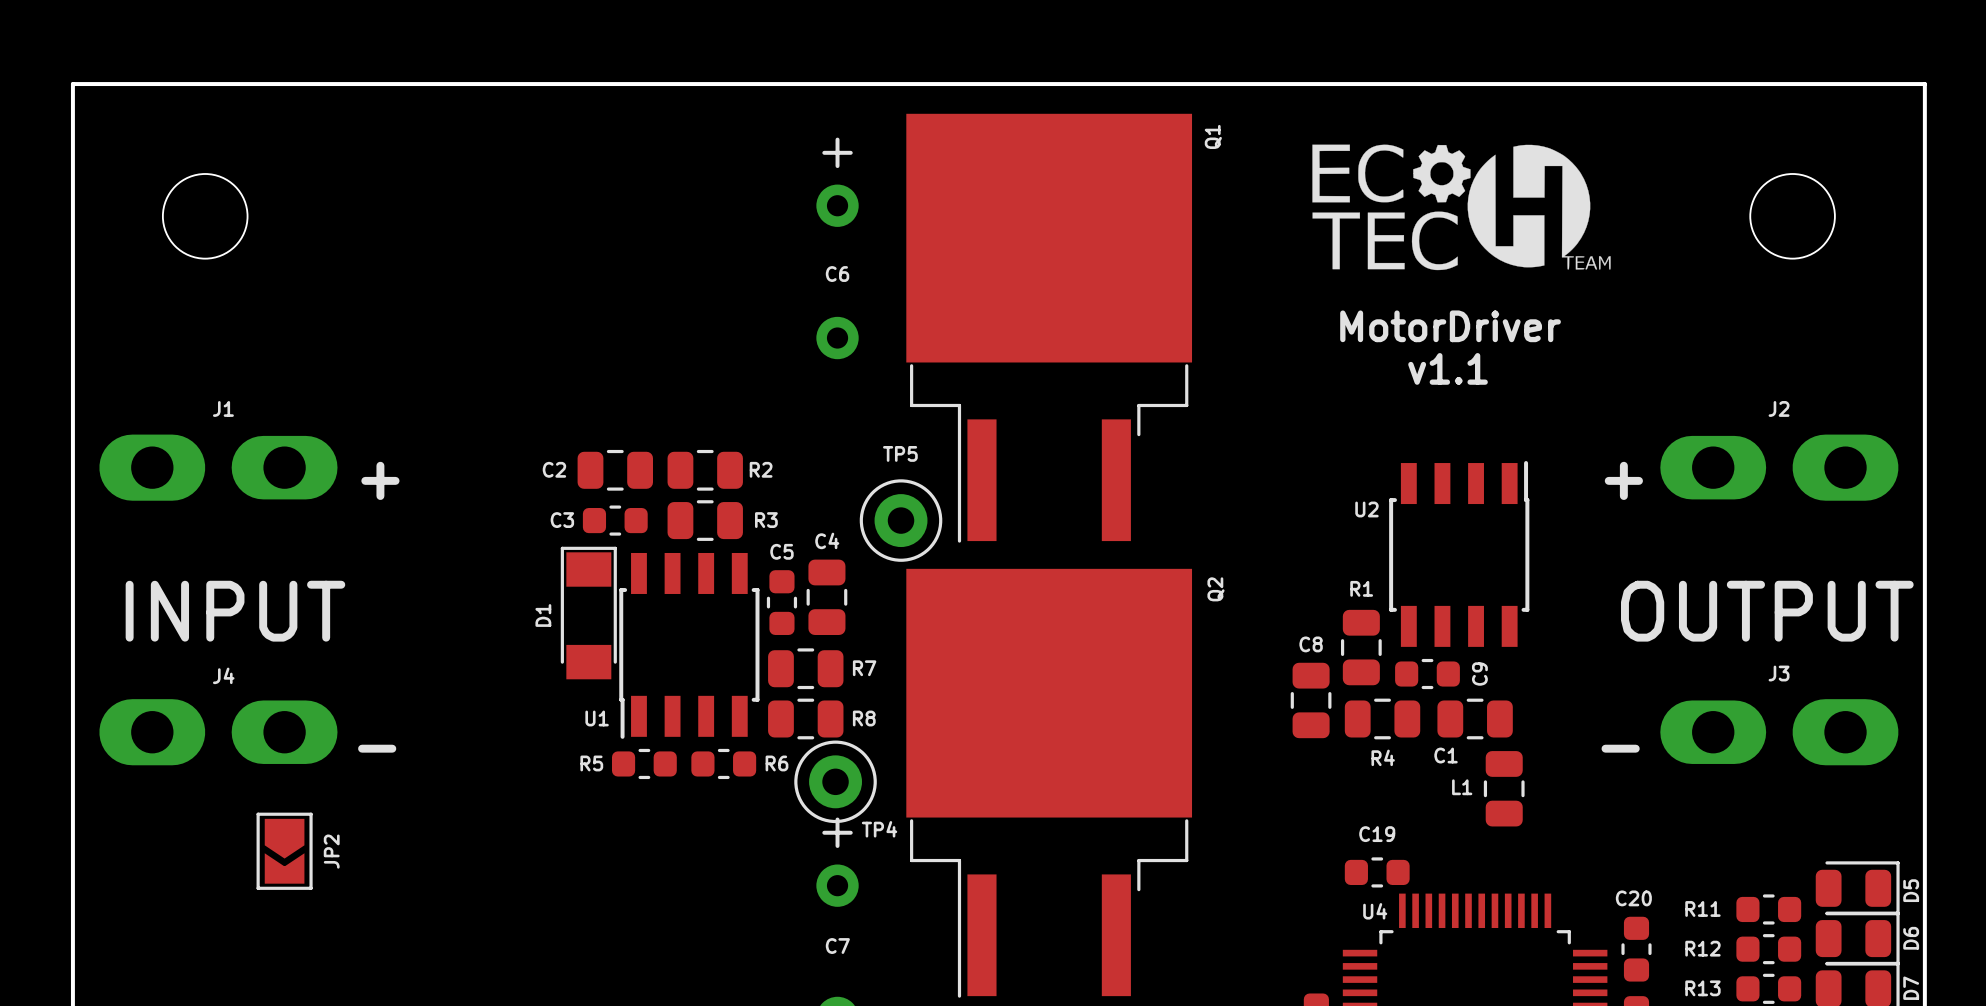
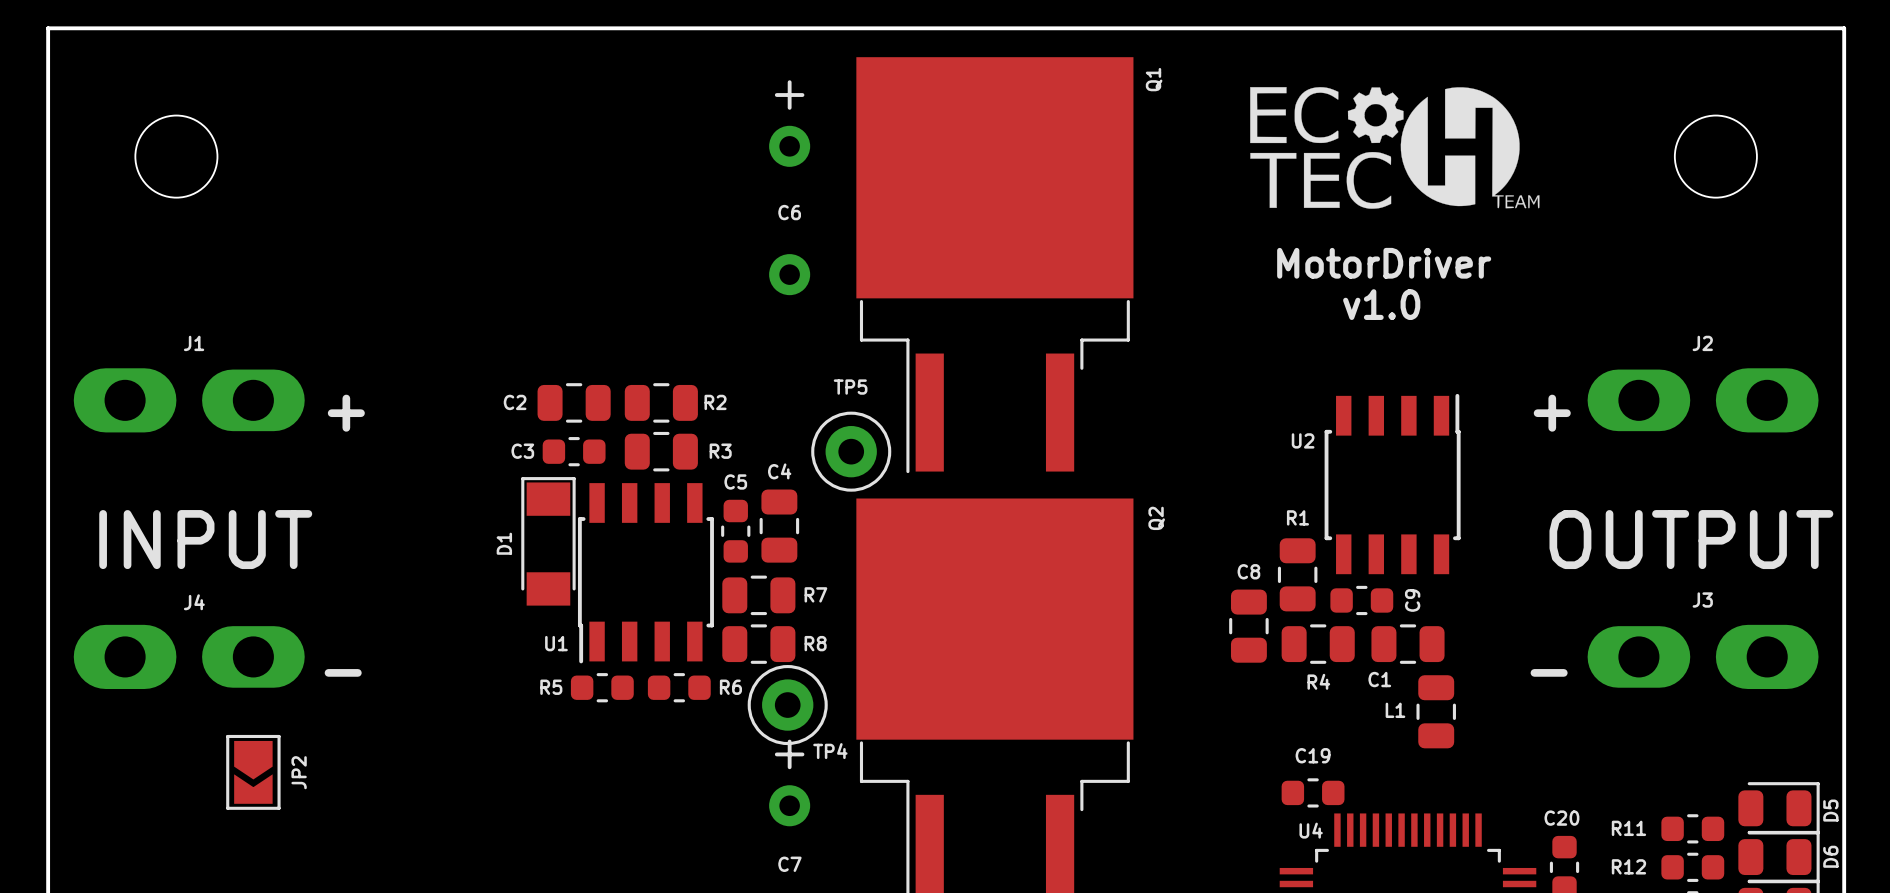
text: v1.1 (1448, 368) -> v1.0 (1381, 304)

